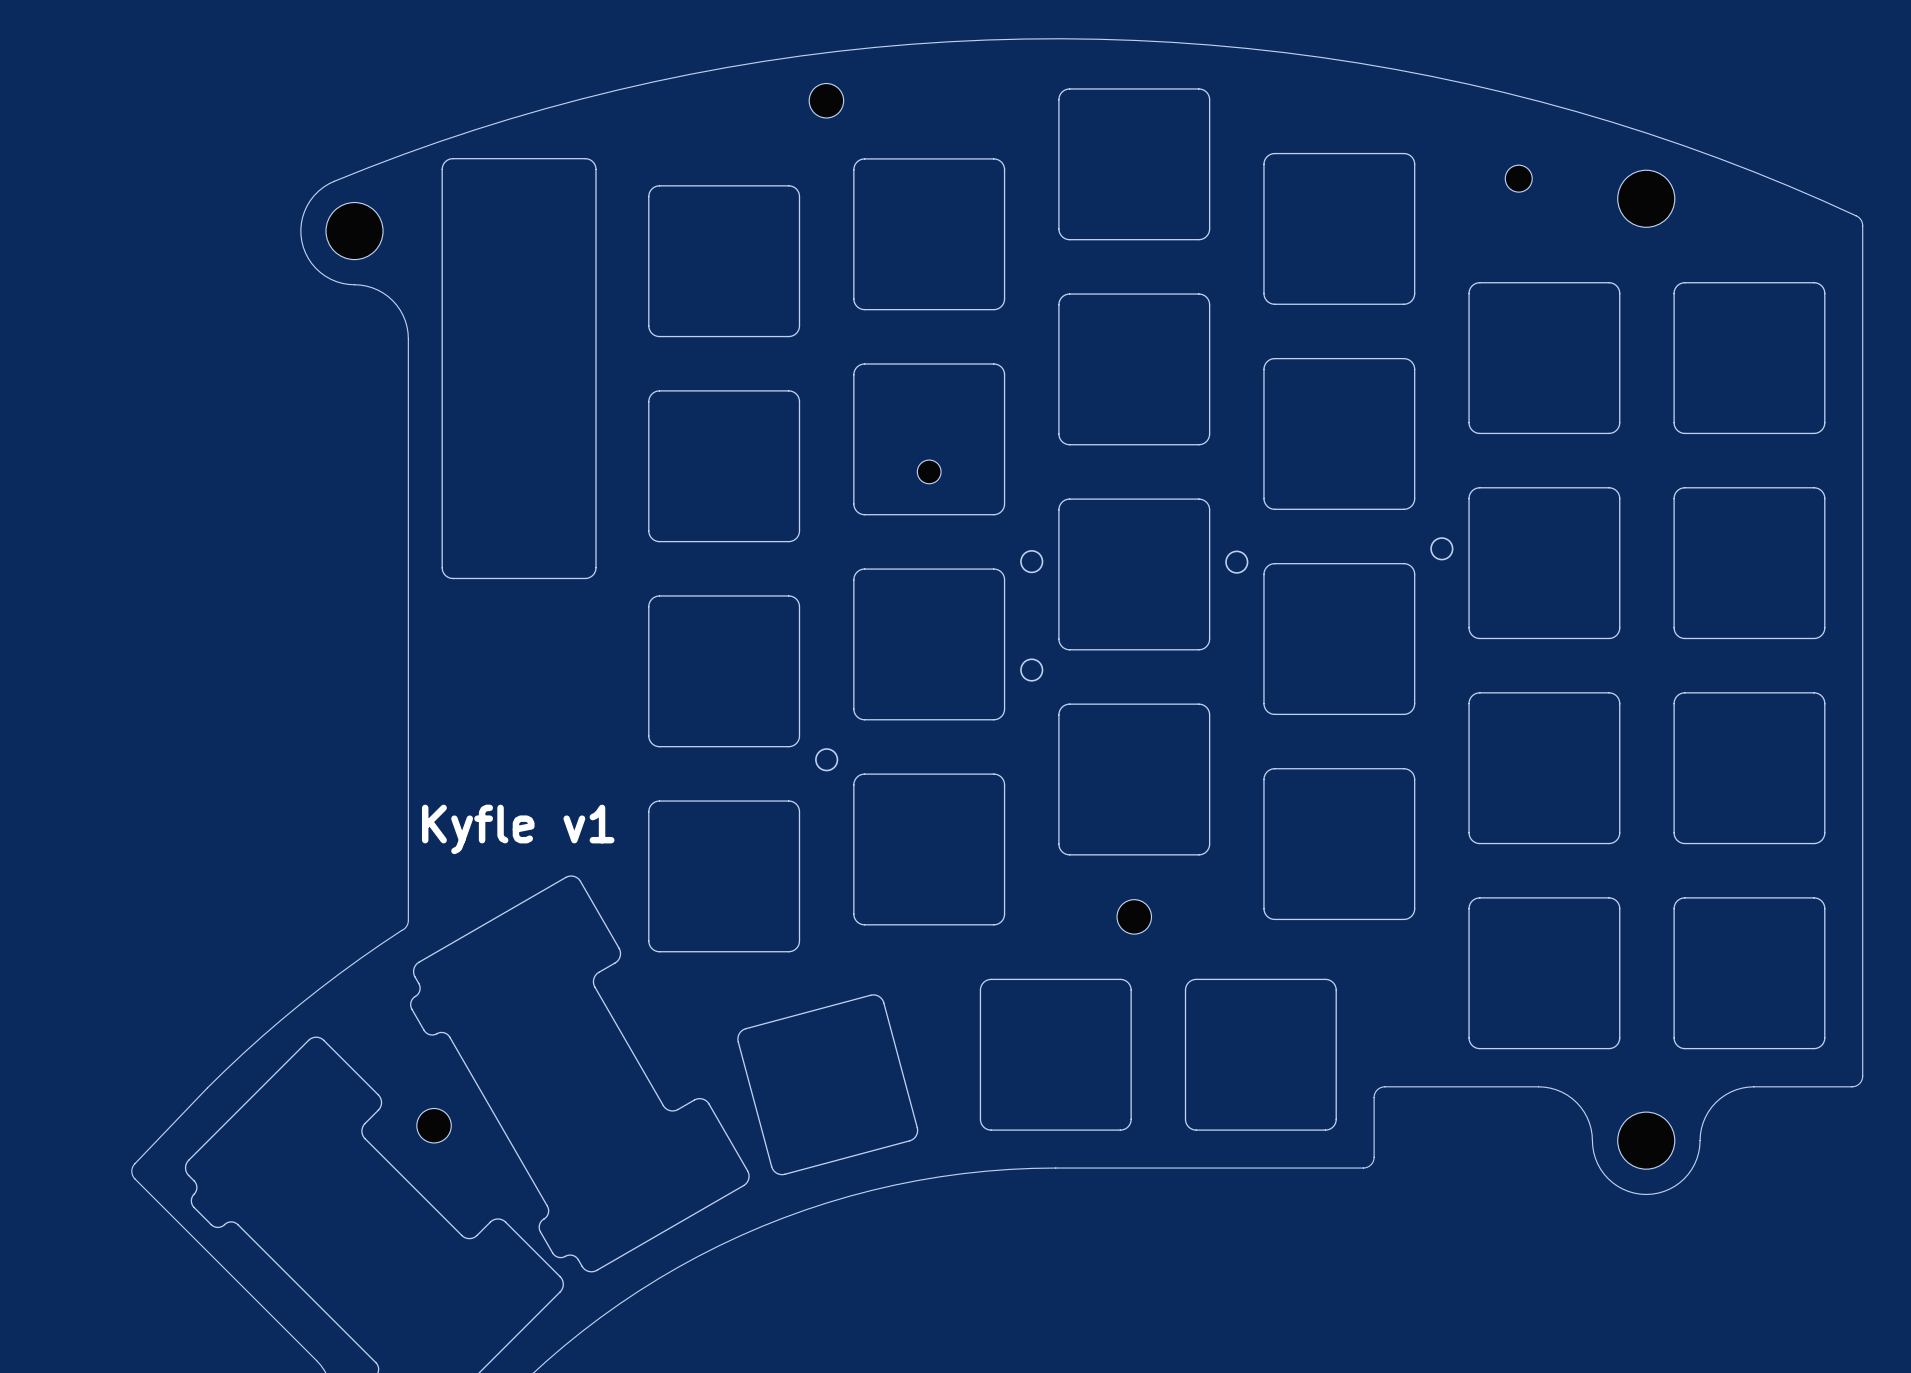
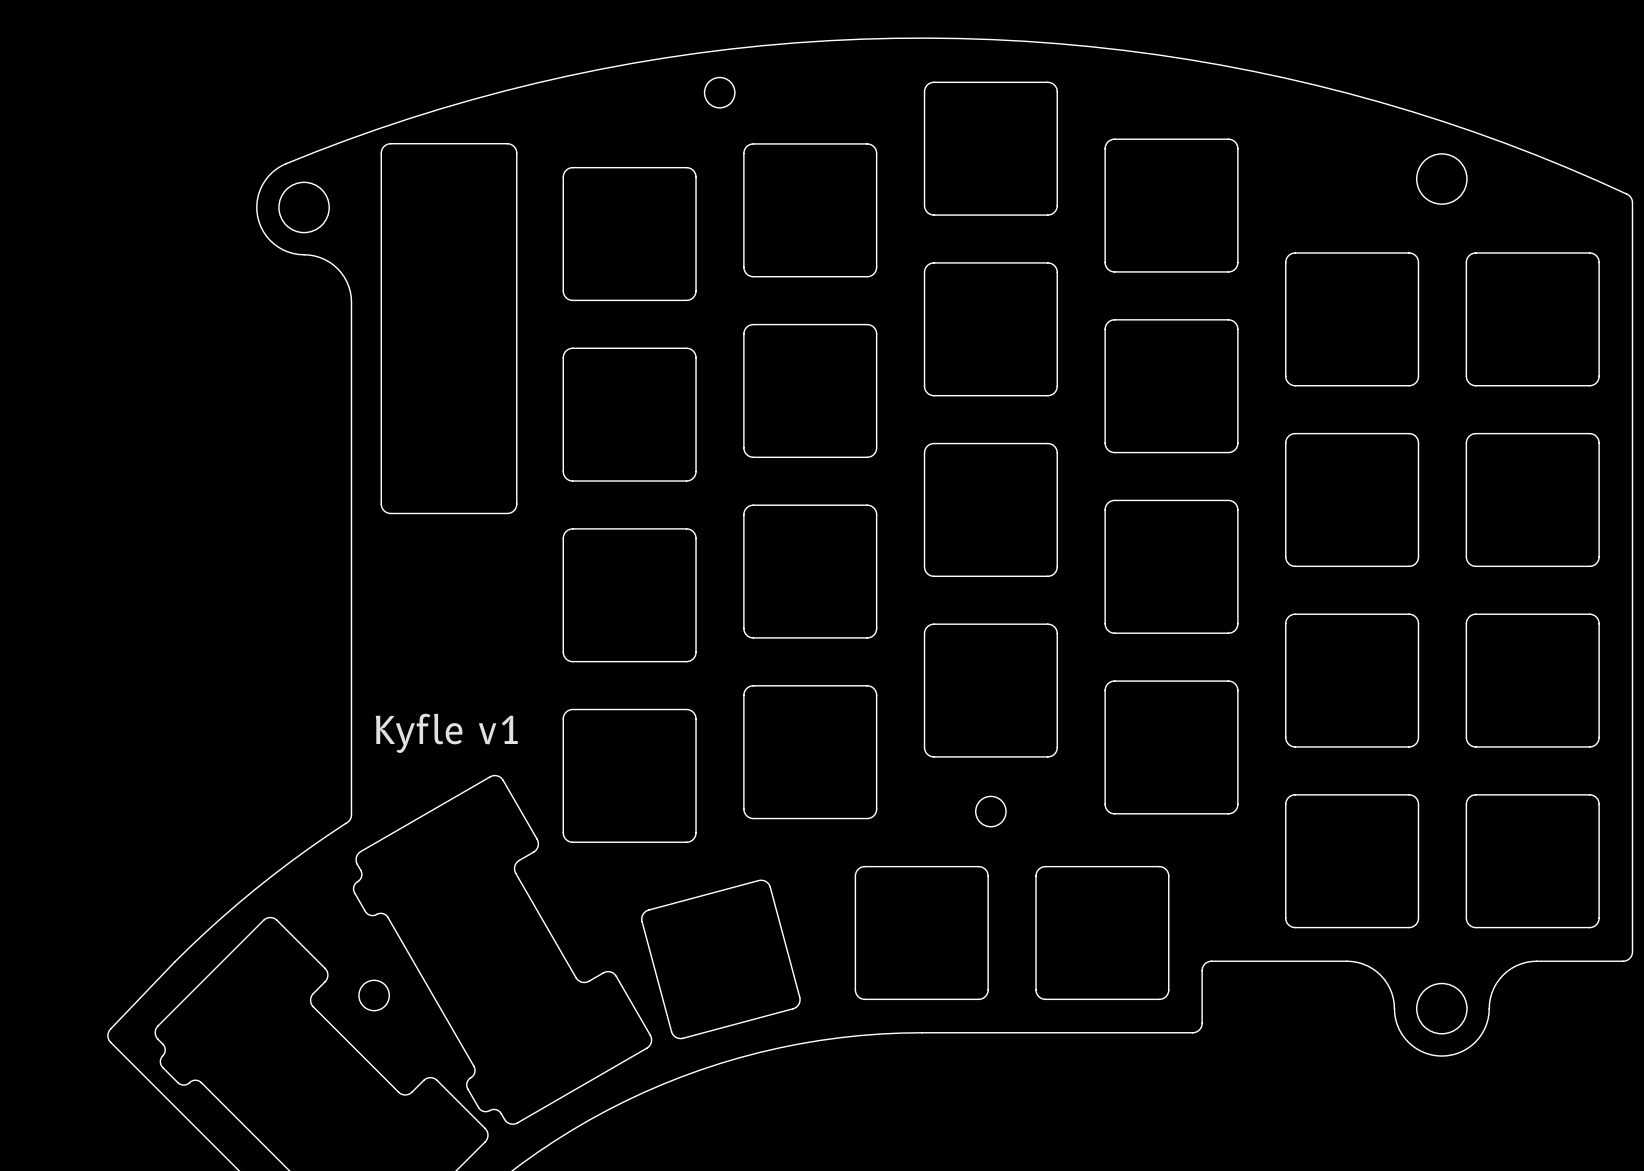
part: (1518, 178) -> none
part: (929, 471) -> none
round board edge: [1430, 537, 1454, 561] -> none
round board edge: [1020, 550, 1044, 574] -> none
round board edge: [1225, 550, 1249, 574] -> none
round board edge: [1020, 658, 1044, 682] -> none
round board edge: [815, 748, 839, 772] -> none

